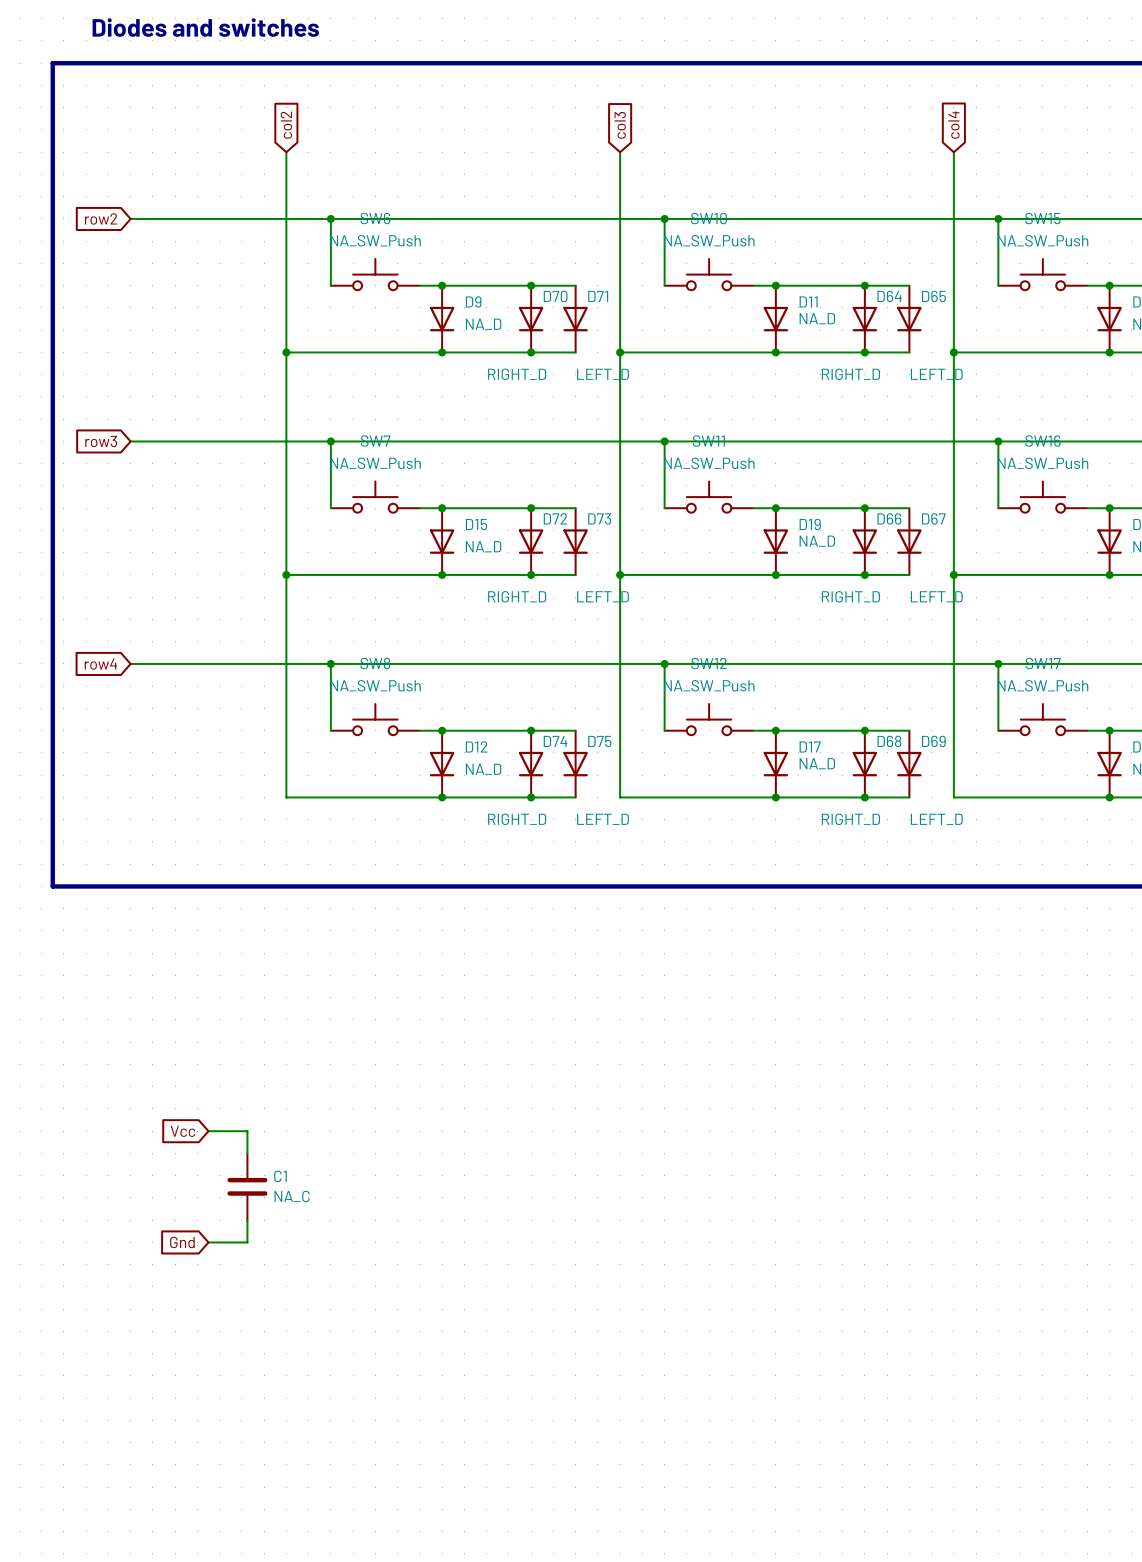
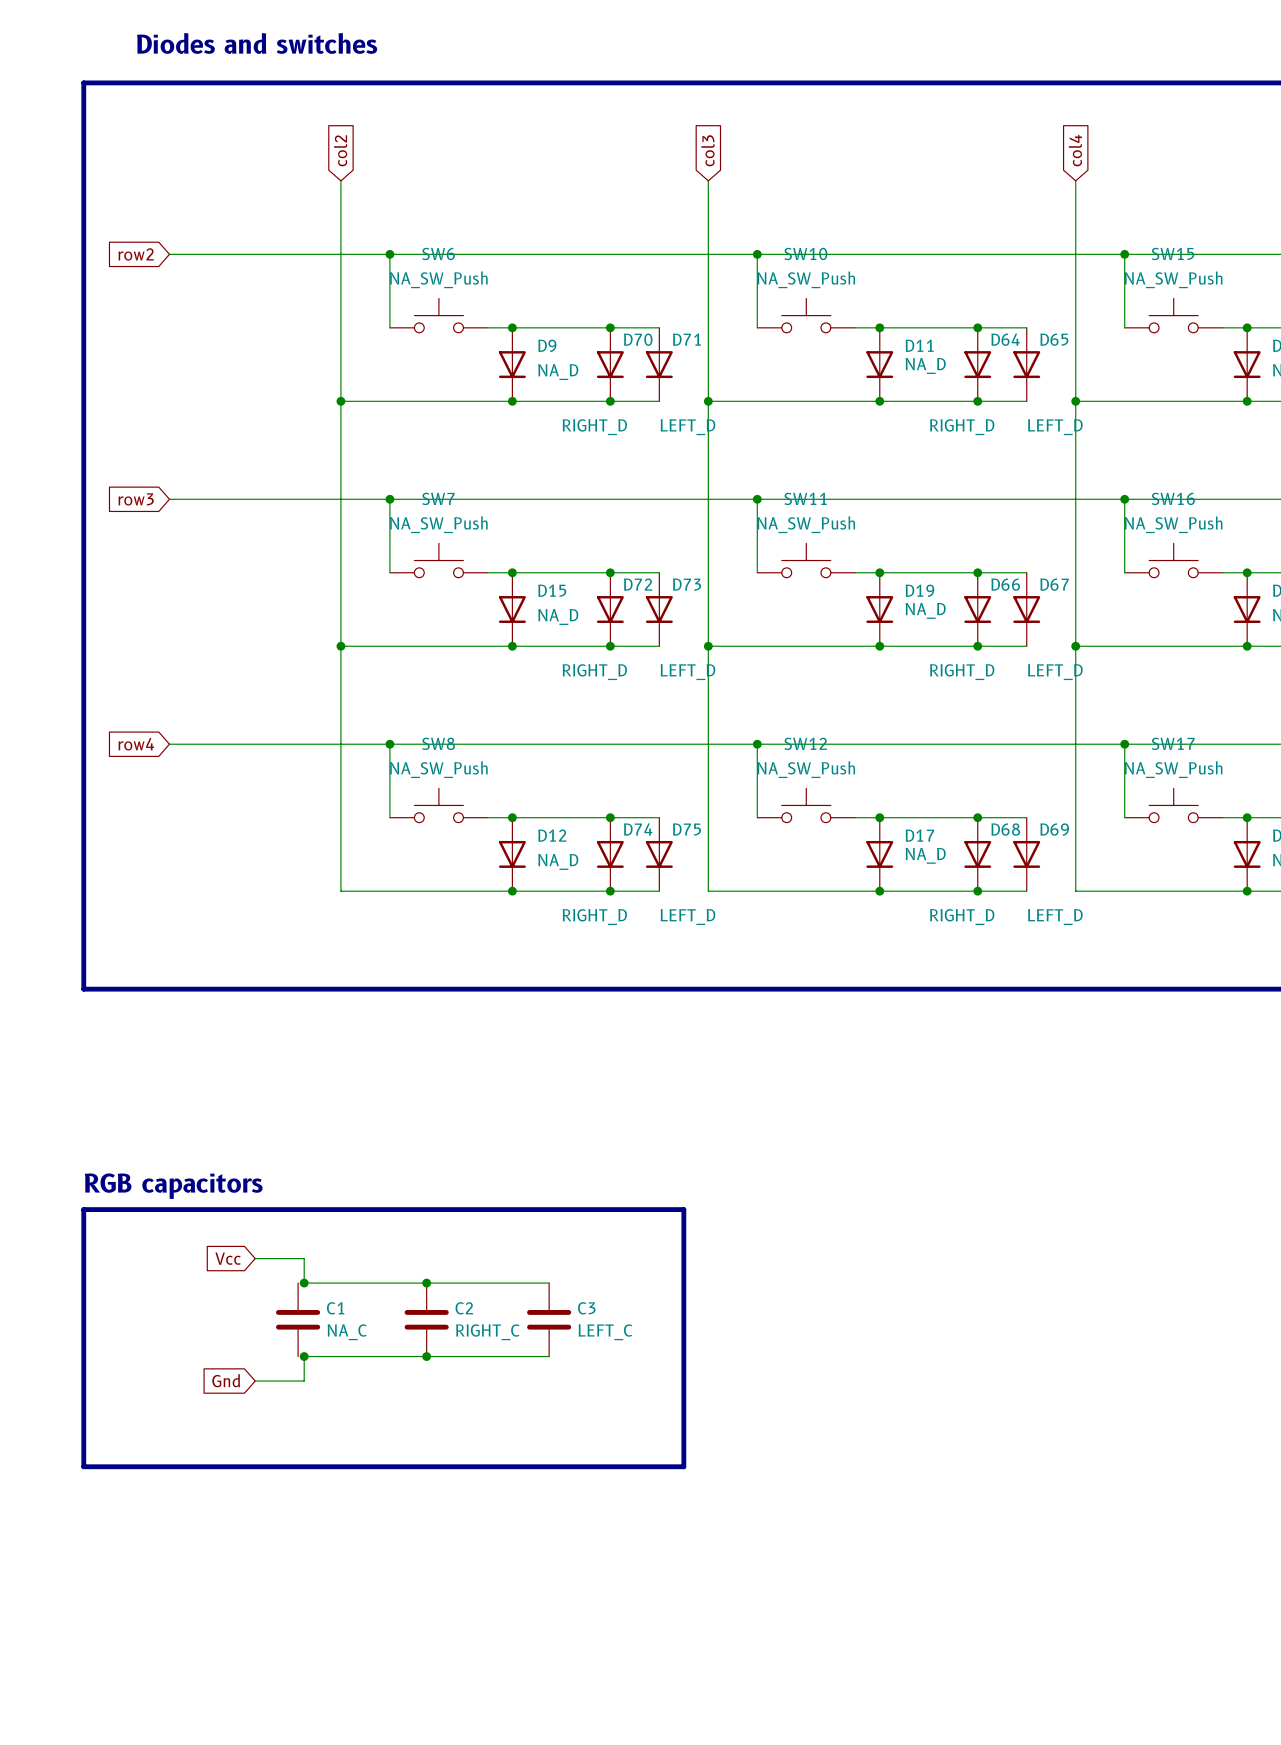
text: none -> RGB capacitors (173, 1186)
line: none -> (83, 1209) (683, 1209) (683, 1466) (83, 1466) (83, 1209)
wire: (247, 1131) (247, 1153) -> (298, 1258) (304, 1258) (304, 1283) (549, 1283)
junction: none -> (304, 1283)
junction: none -> (426, 1283)
C2: none -> RIGHT_C (426, 1319)
C3: none -> LEFT_C (549, 1319)
wire: (247, 1220) (247, 1242) -> (549, 1356) (304, 1356) (304, 1381) (298, 1381)
junction: none -> (304, 1356)
junction: none -> (426, 1356)

